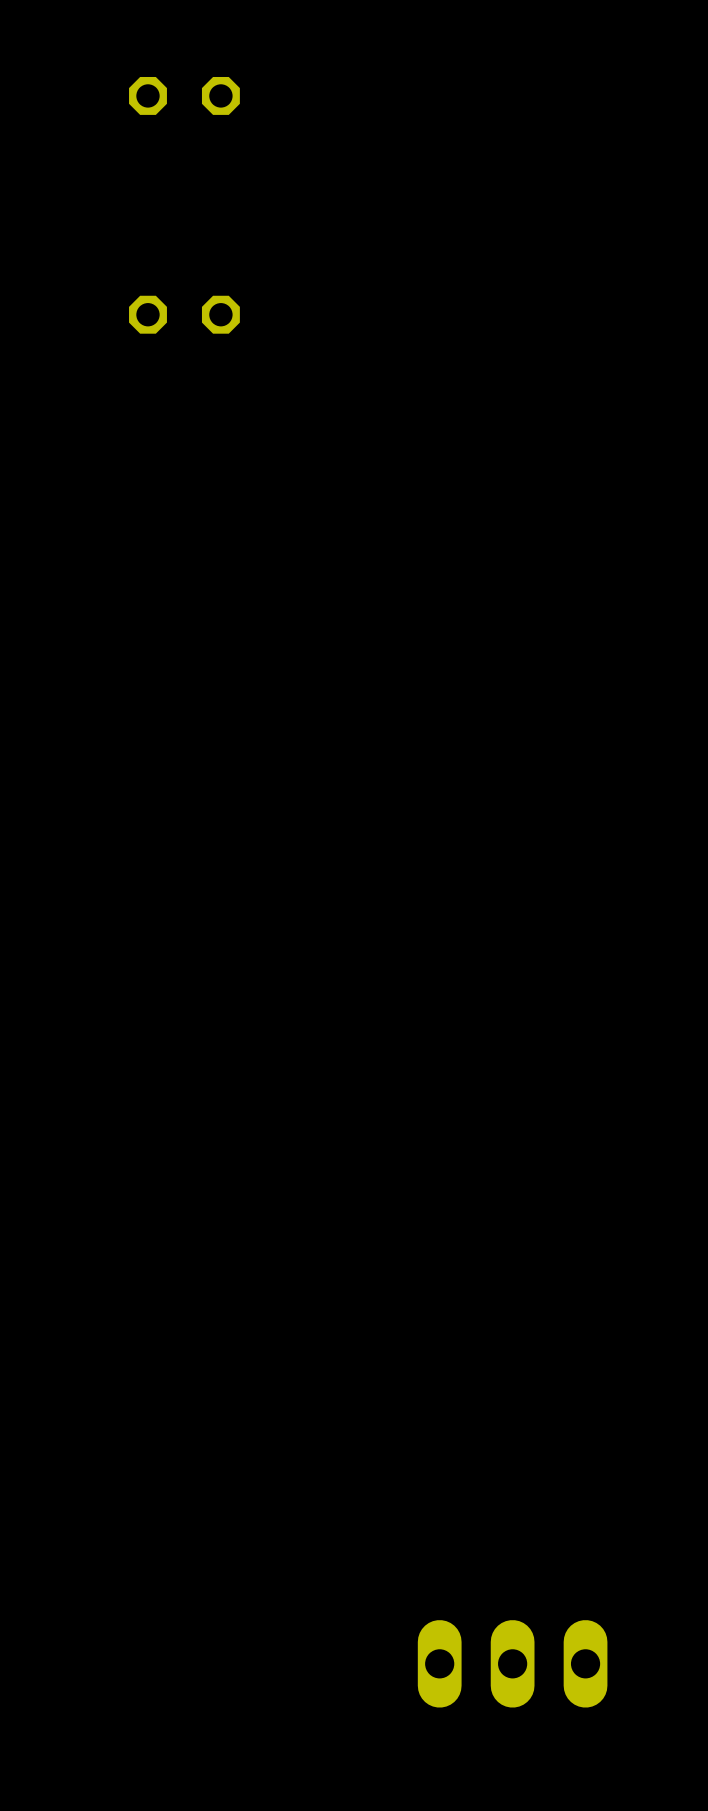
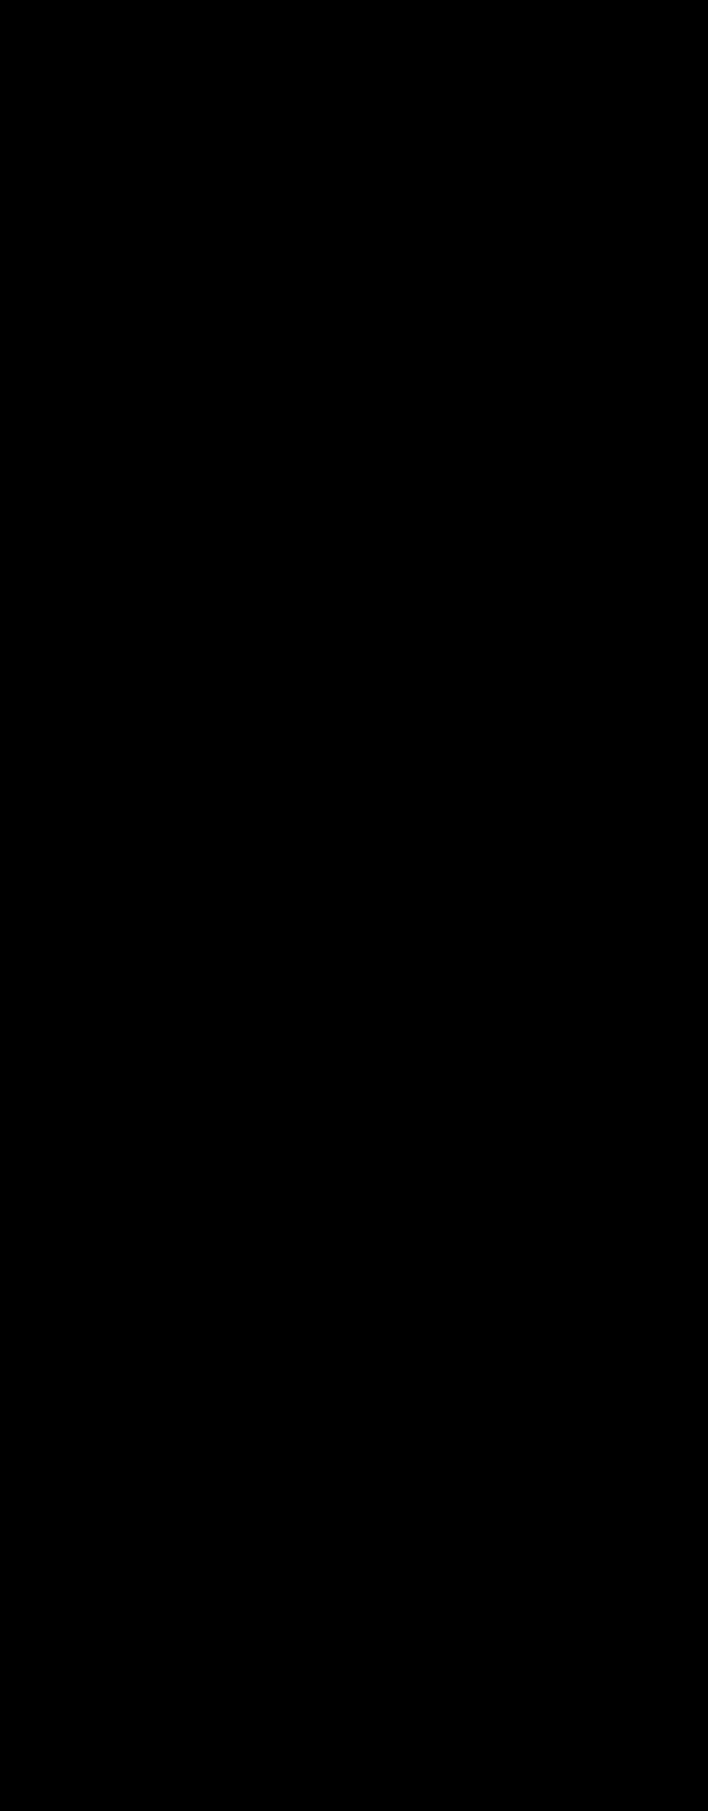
part: (184, 95) -> none
part: (184, 314) -> none
part: (512, 1663) -> none

